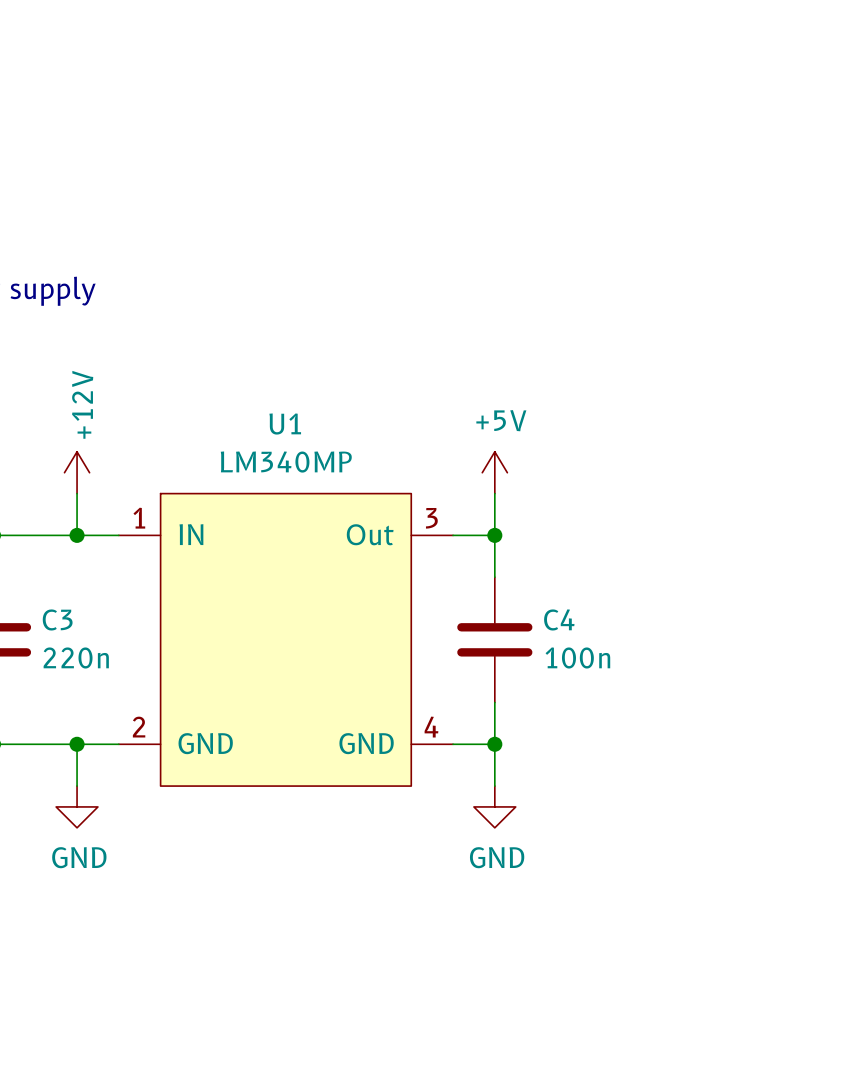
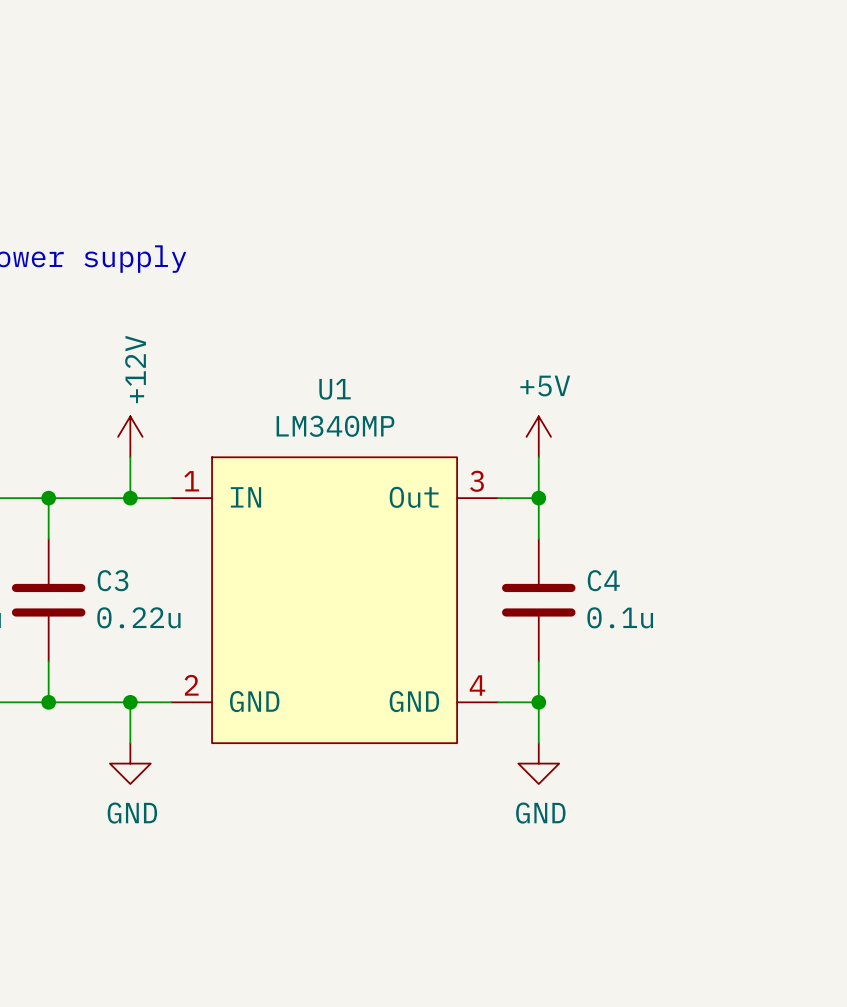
C3 value: 220n (76, 657) -> 0.22u (138, 617)
C4 value: 100n (577, 657) -> 0.1u (620, 617)

